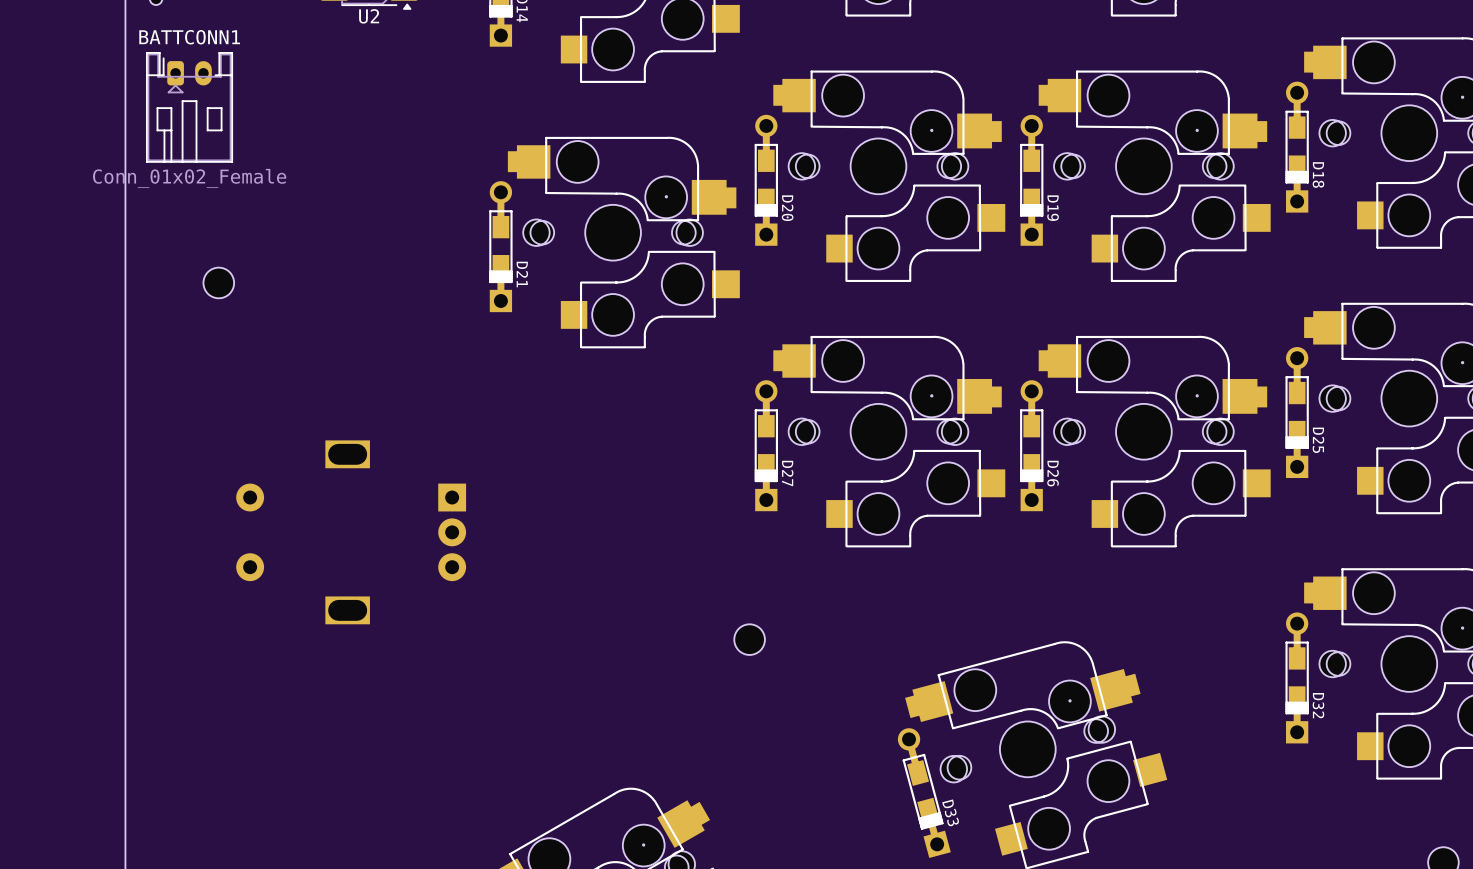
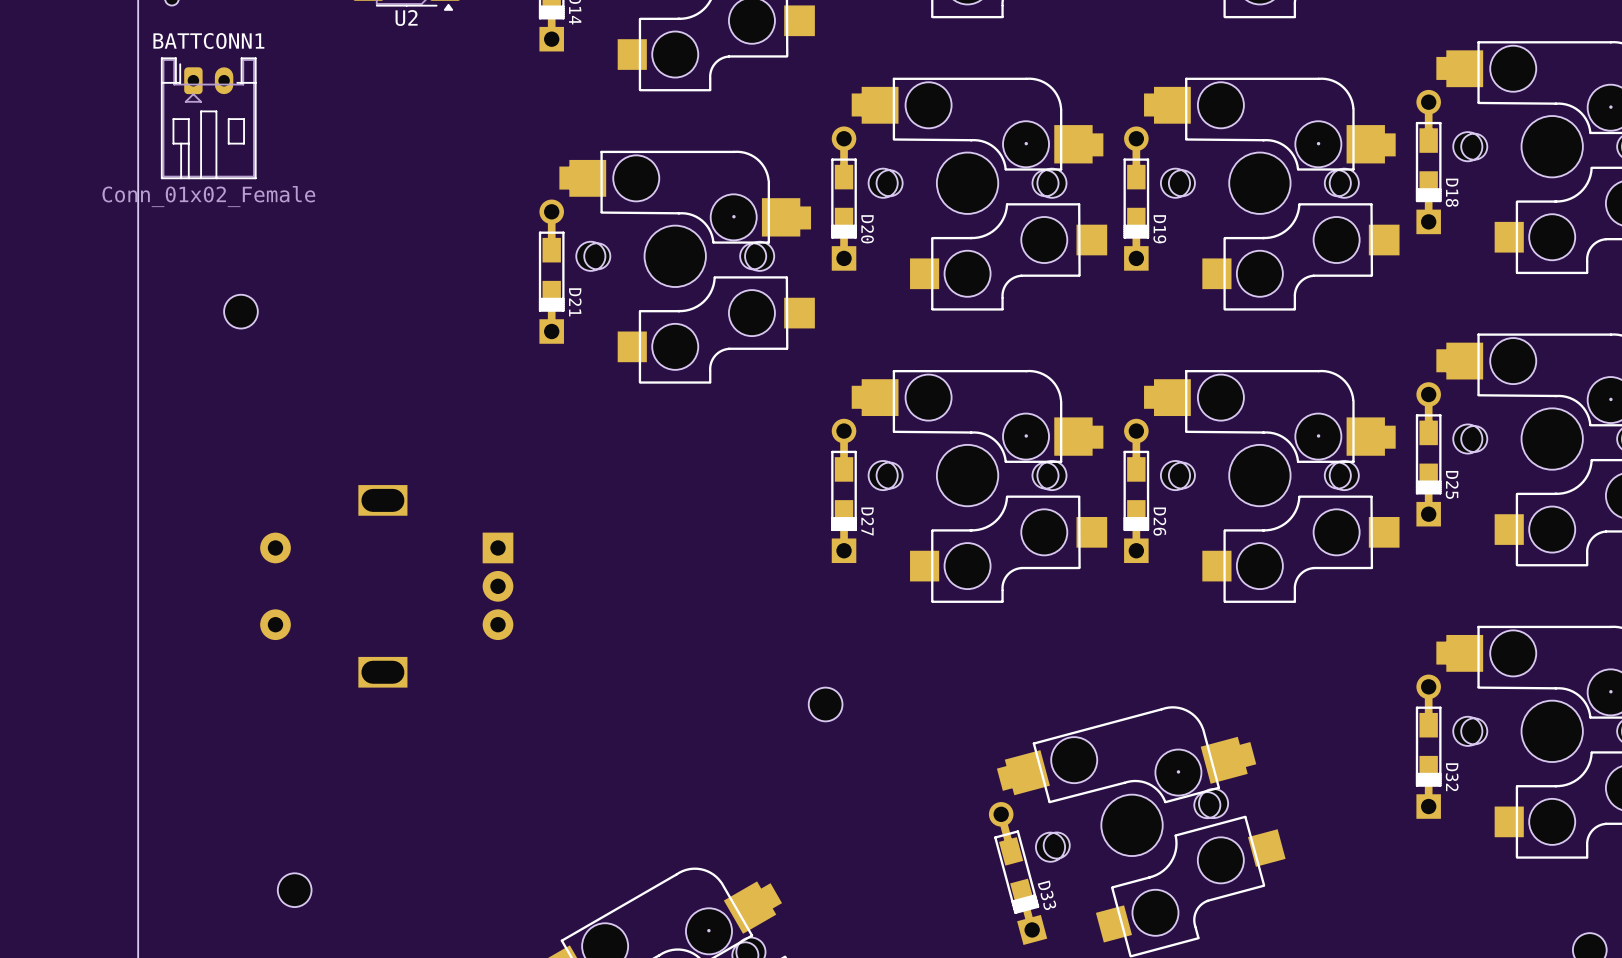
part: none -> (294, 890)

